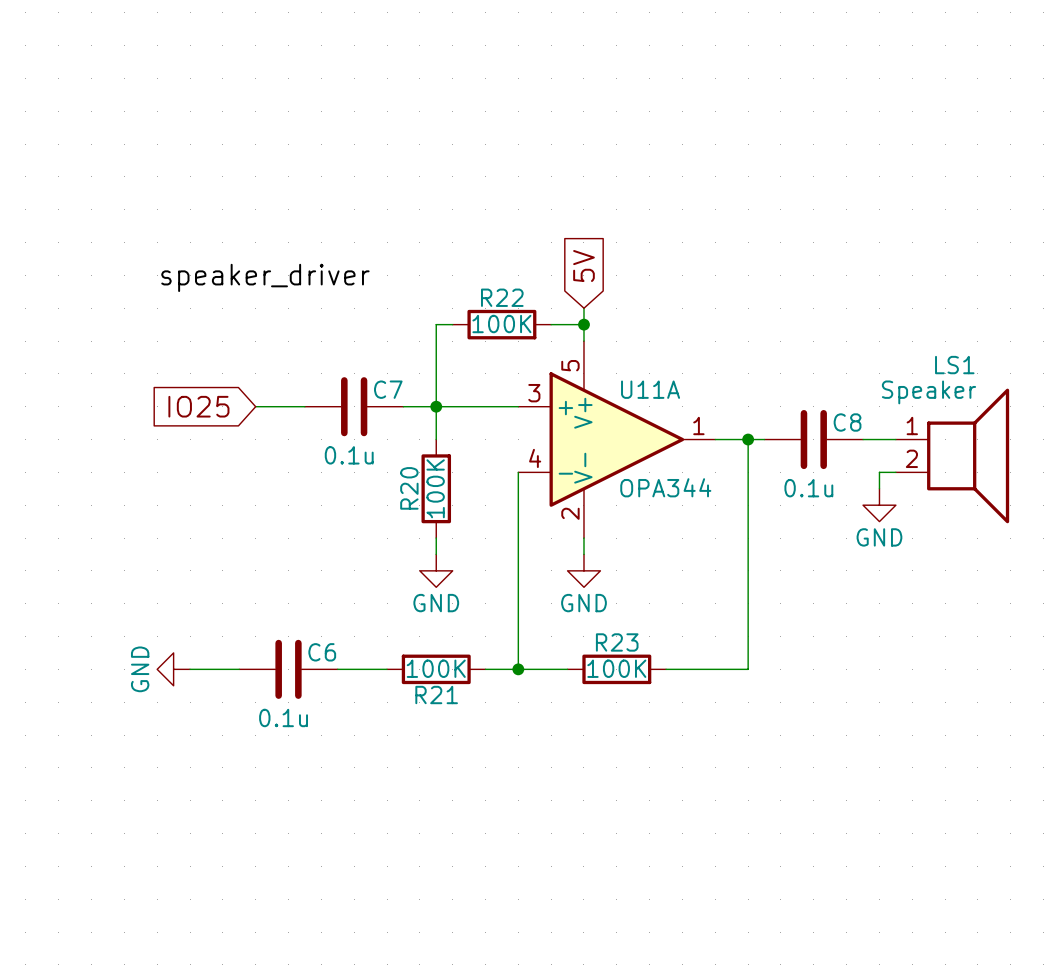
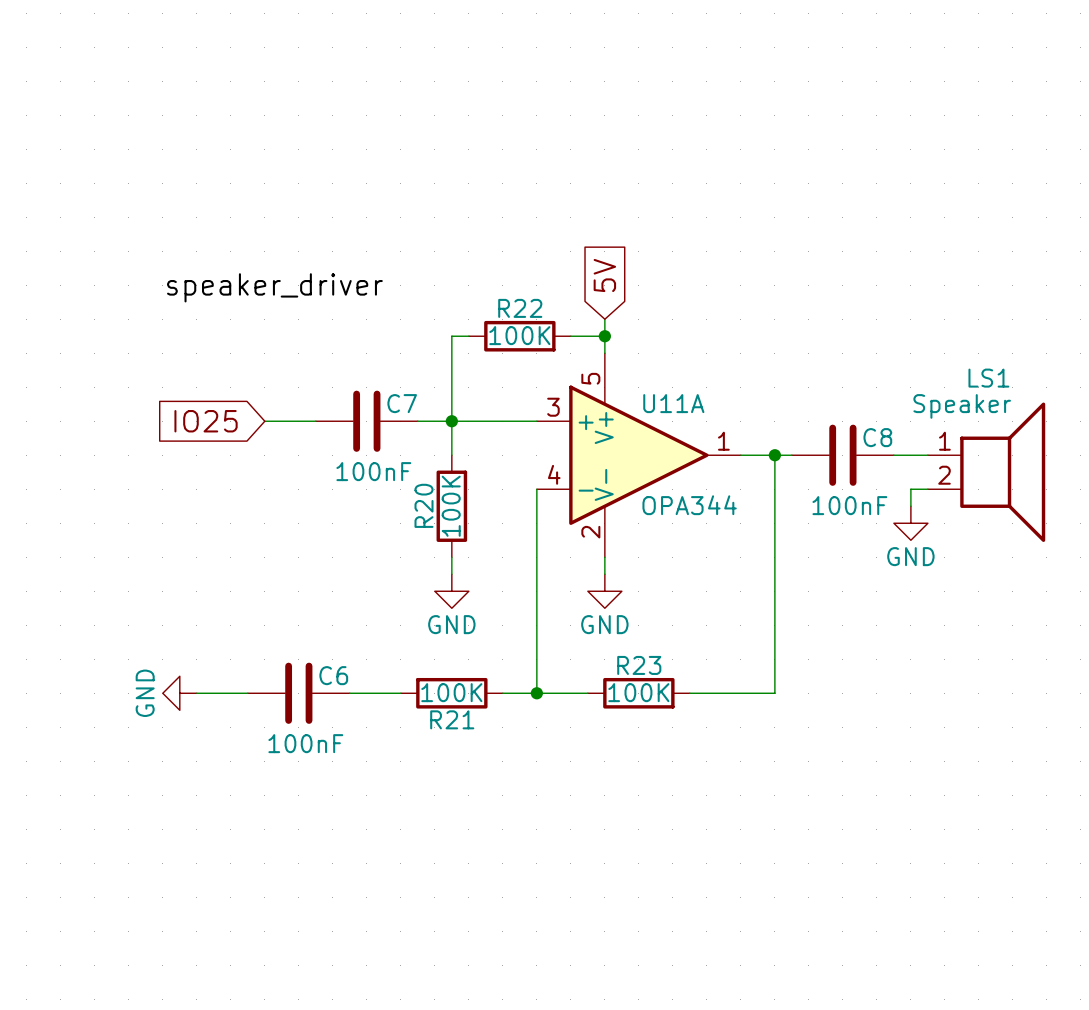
C7 value: 0.1u (349, 455) -> 100nF (373, 471)
C8 value: 0.1u (808, 488) -> 100nF (849, 505)
C6 value: 0.1u (283, 717) -> 100nF (305, 743)

